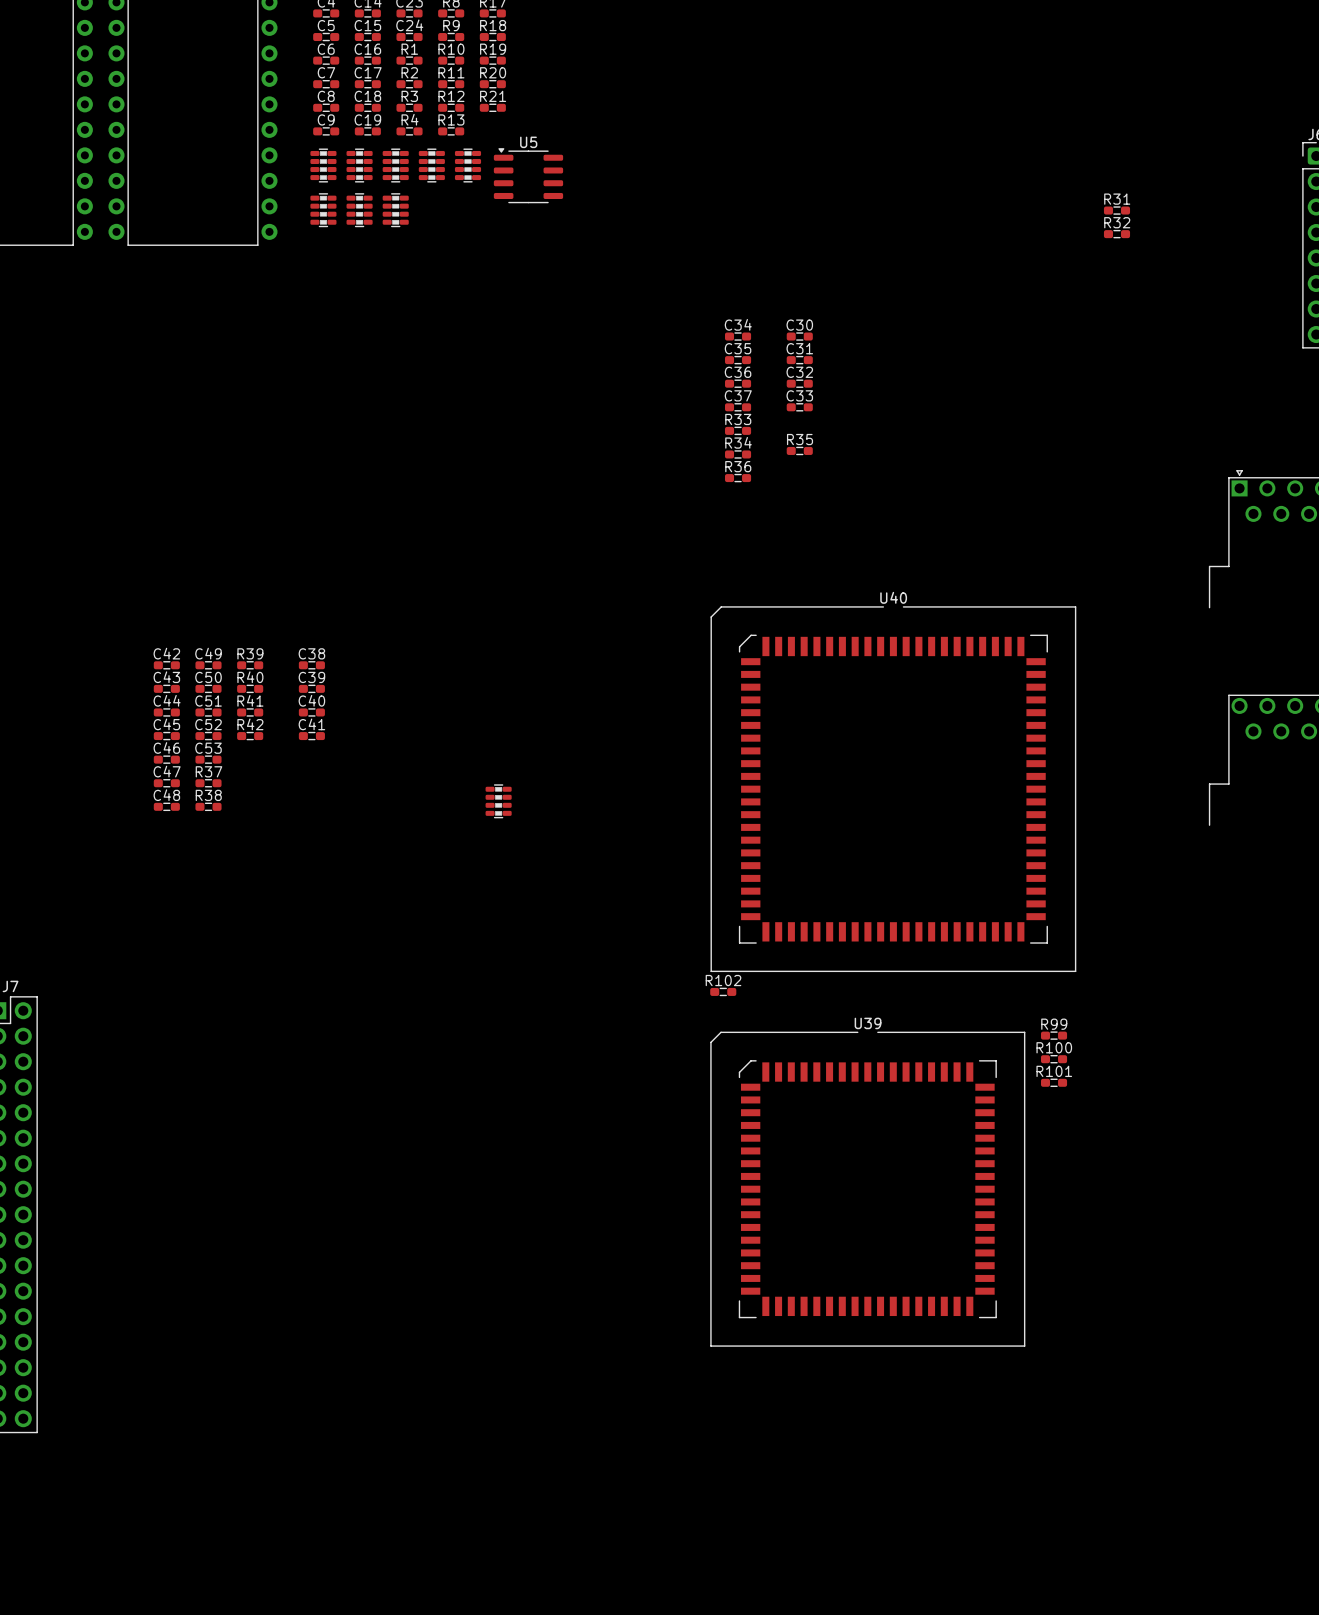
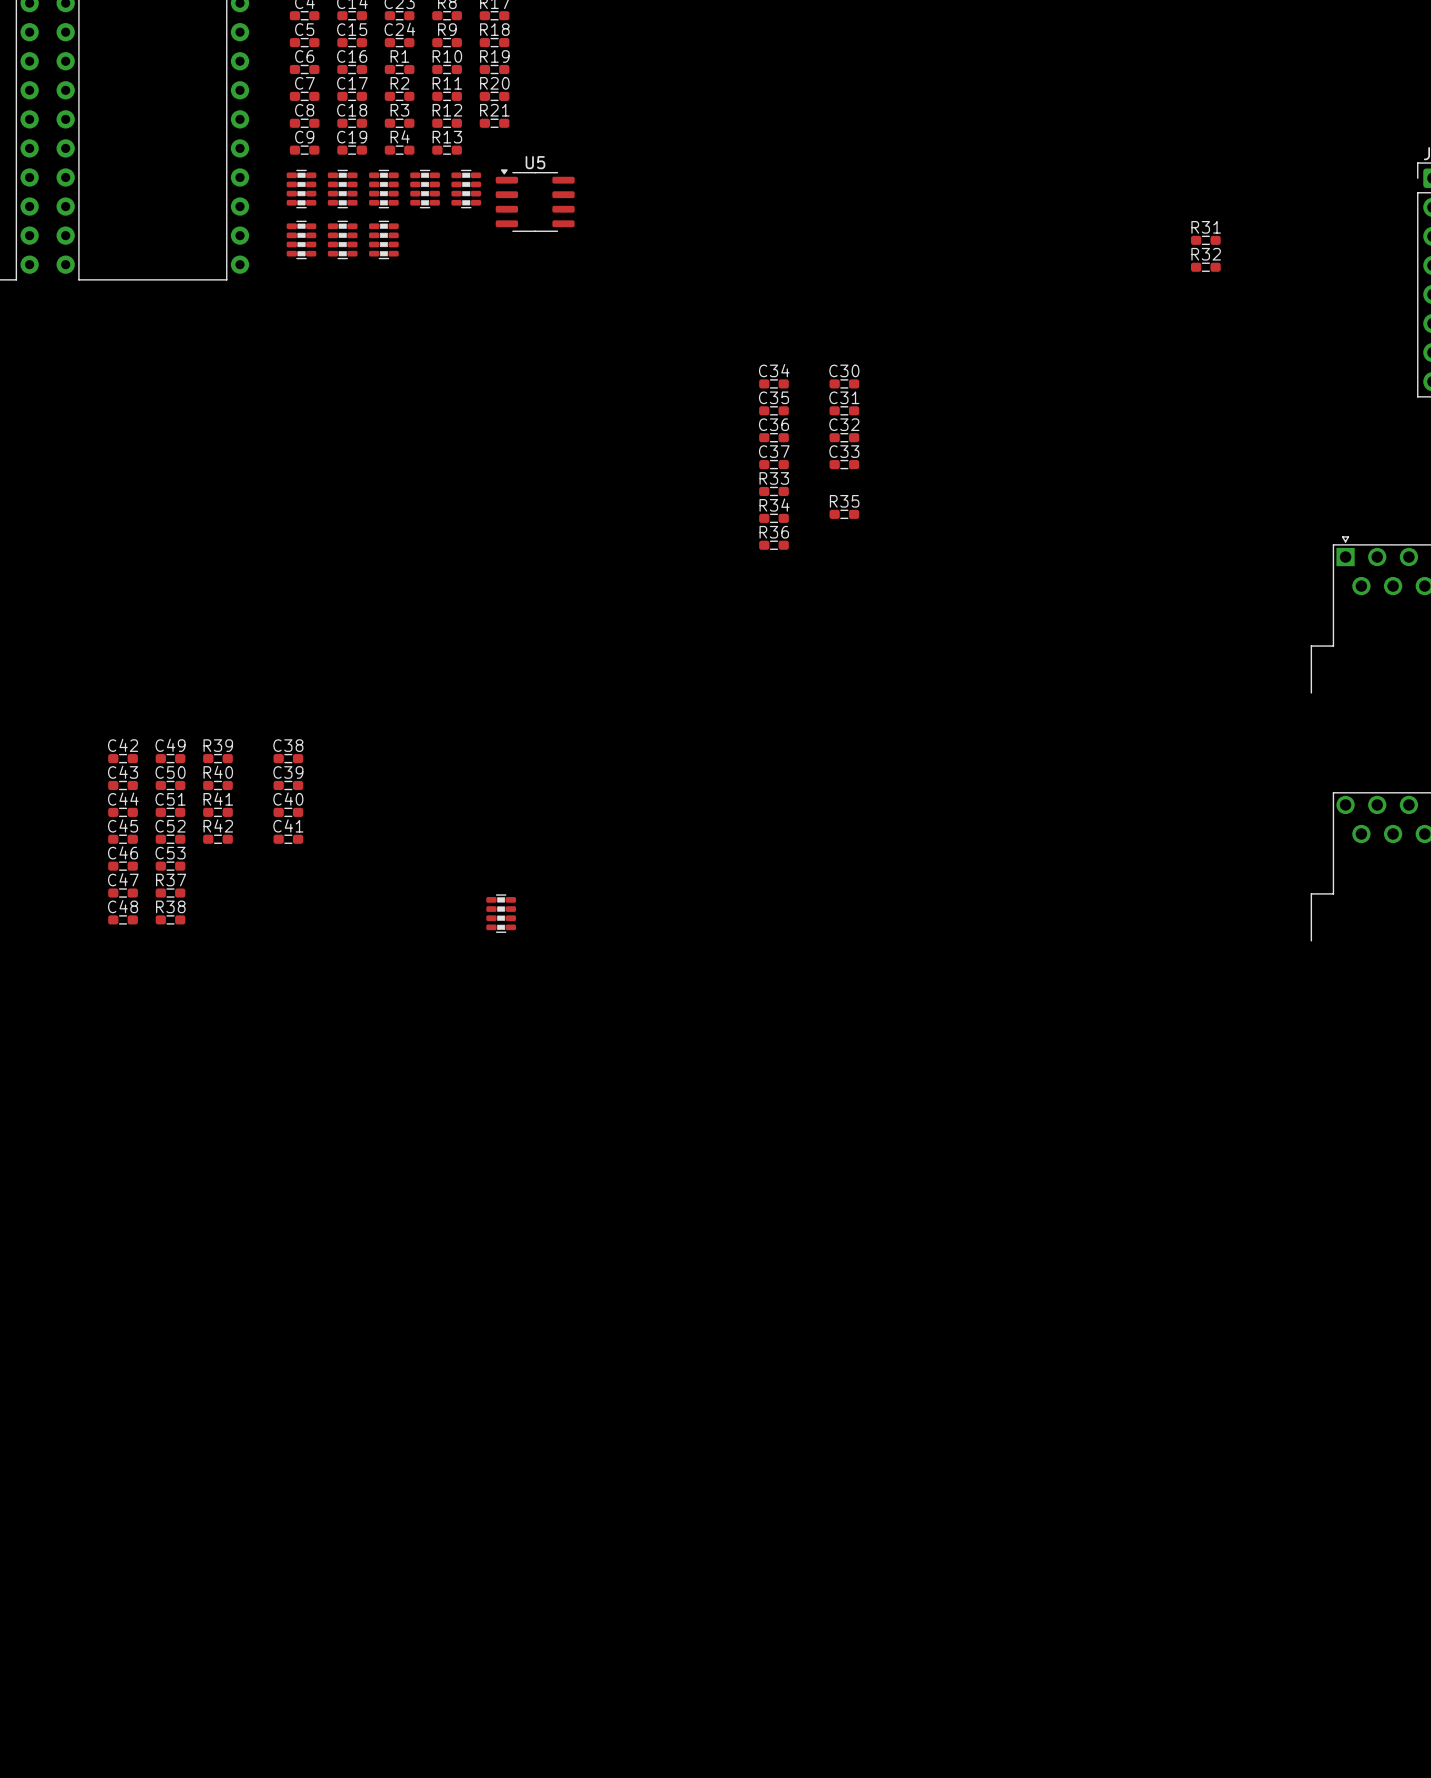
U40: (893, 789) -> none
R102: (723, 991) -> none
R99: (1054, 1035) -> none
R100: (1054, 1059) -> none
R101: (1054, 1082) -> none
U39: (867, 1189) -> none

